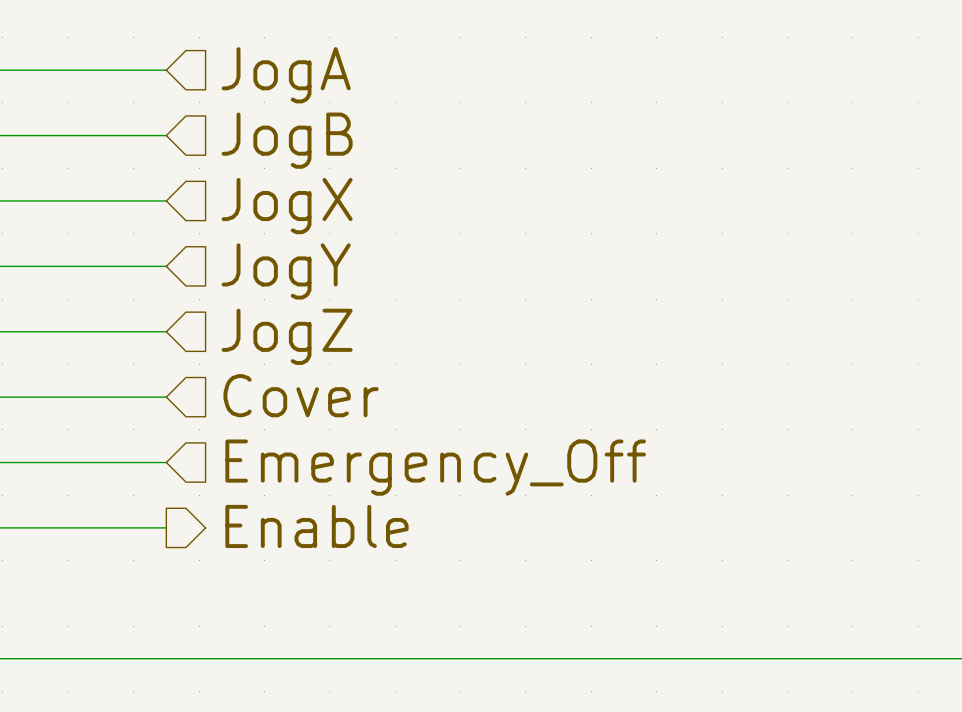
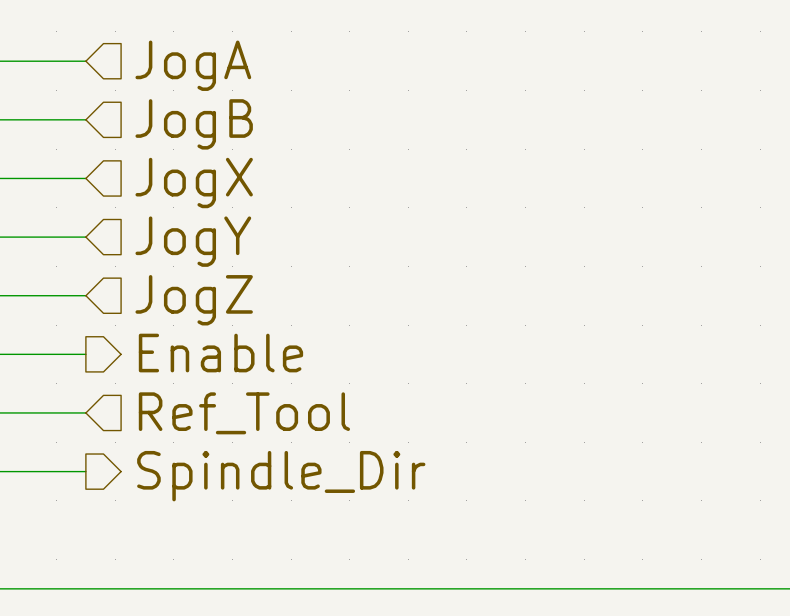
hierarchical label shape: input (301, 395) -> output (220, 353)
hierarchical label: Cover (301, 395) -> Enable (220, 353)
hierarchical label: Emergency_Off (435, 467) -> Ref_Tool (244, 413)
hierarchical label: Enable (316, 526) -> Spindle_Dir (281, 476)

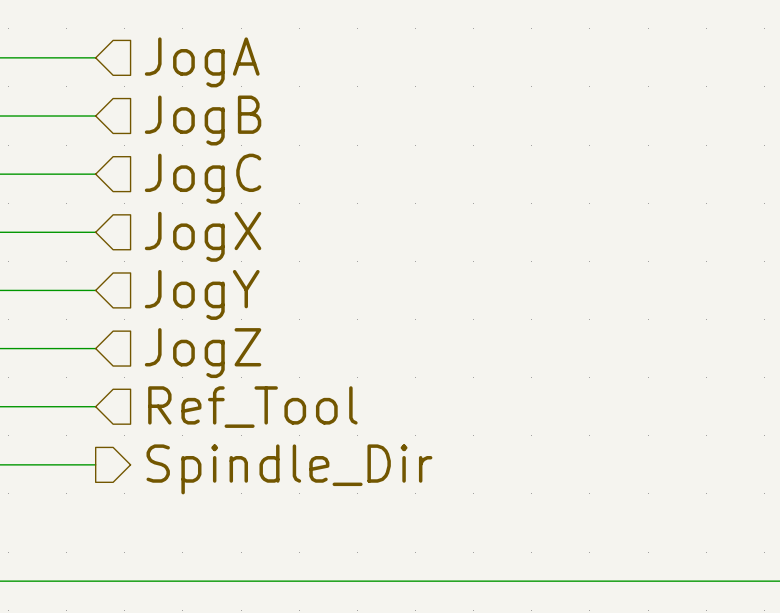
hierarchical label: JogX (194, 183) -> JogC (203, 178)
hierarchical label: JogY (193, 241) -> JogX (203, 236)
hierarchical label: JogZ (194, 300) -> JogY (202, 294)
hierarchical label shape: output (220, 353) -> input (203, 353)
hierarchical label: Enable (220, 353) -> JogZ (203, 353)

